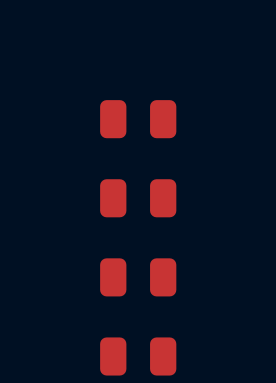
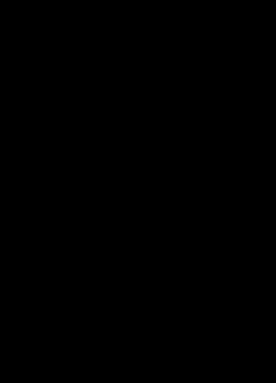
part: (138, 119) -> none
part: (138, 198) -> none
part: (138, 277) -> none
part: (138, 356) -> none

